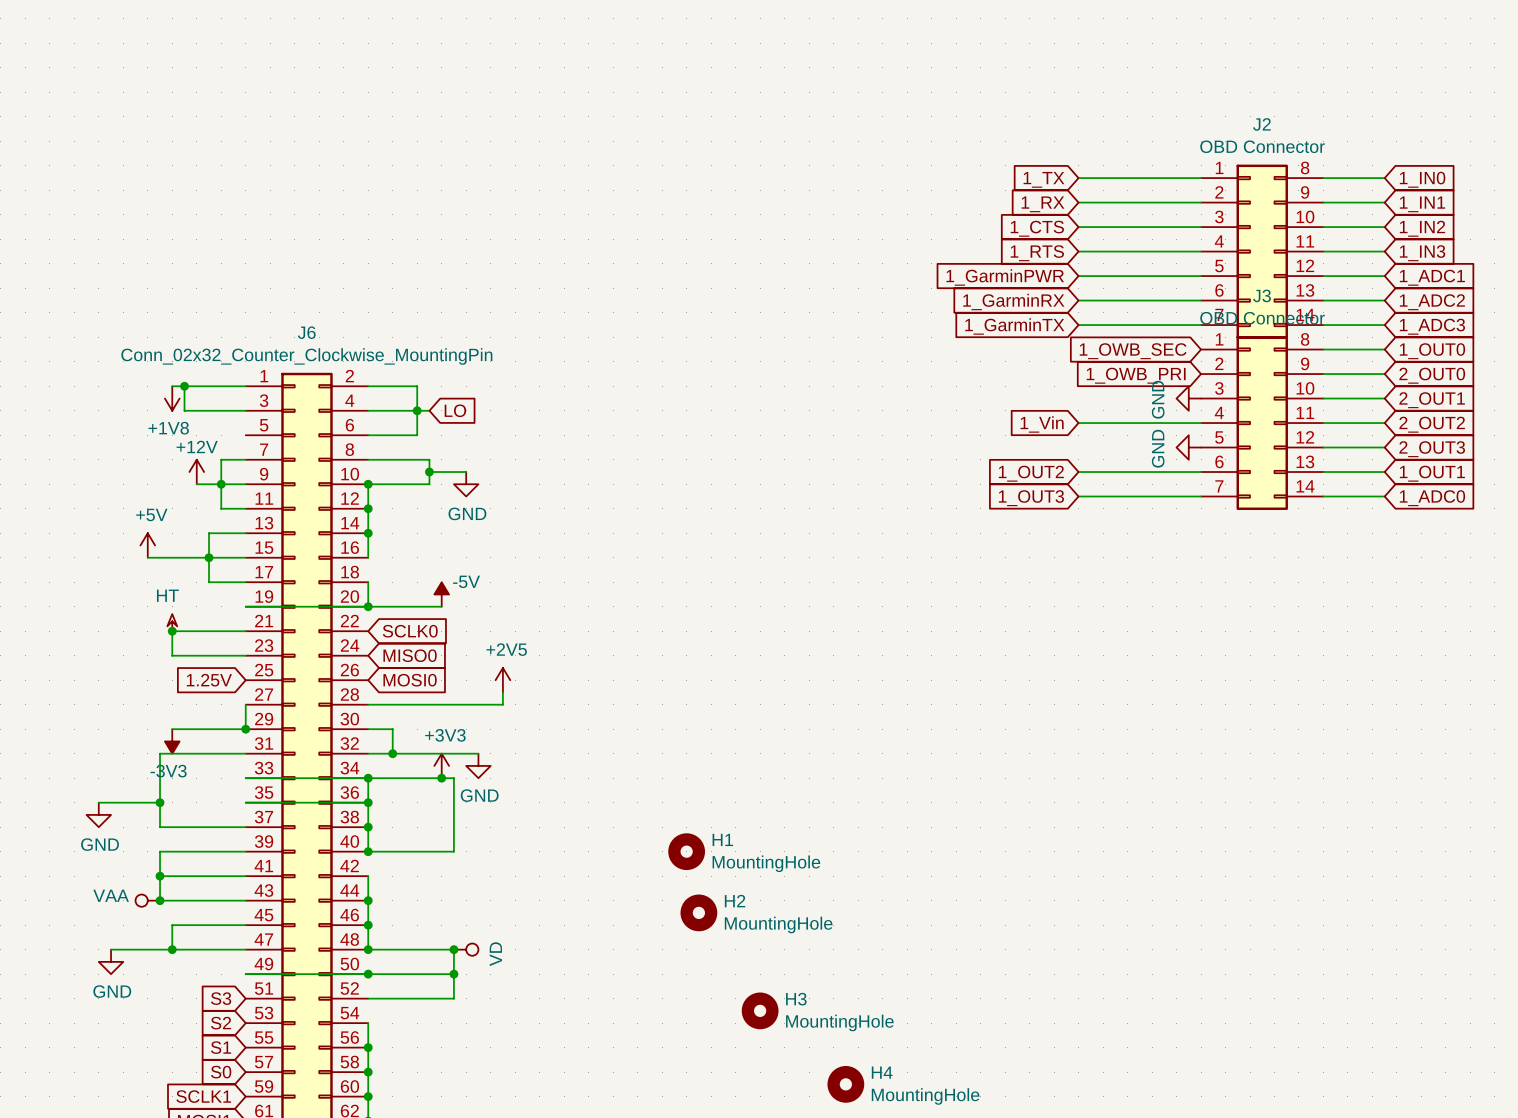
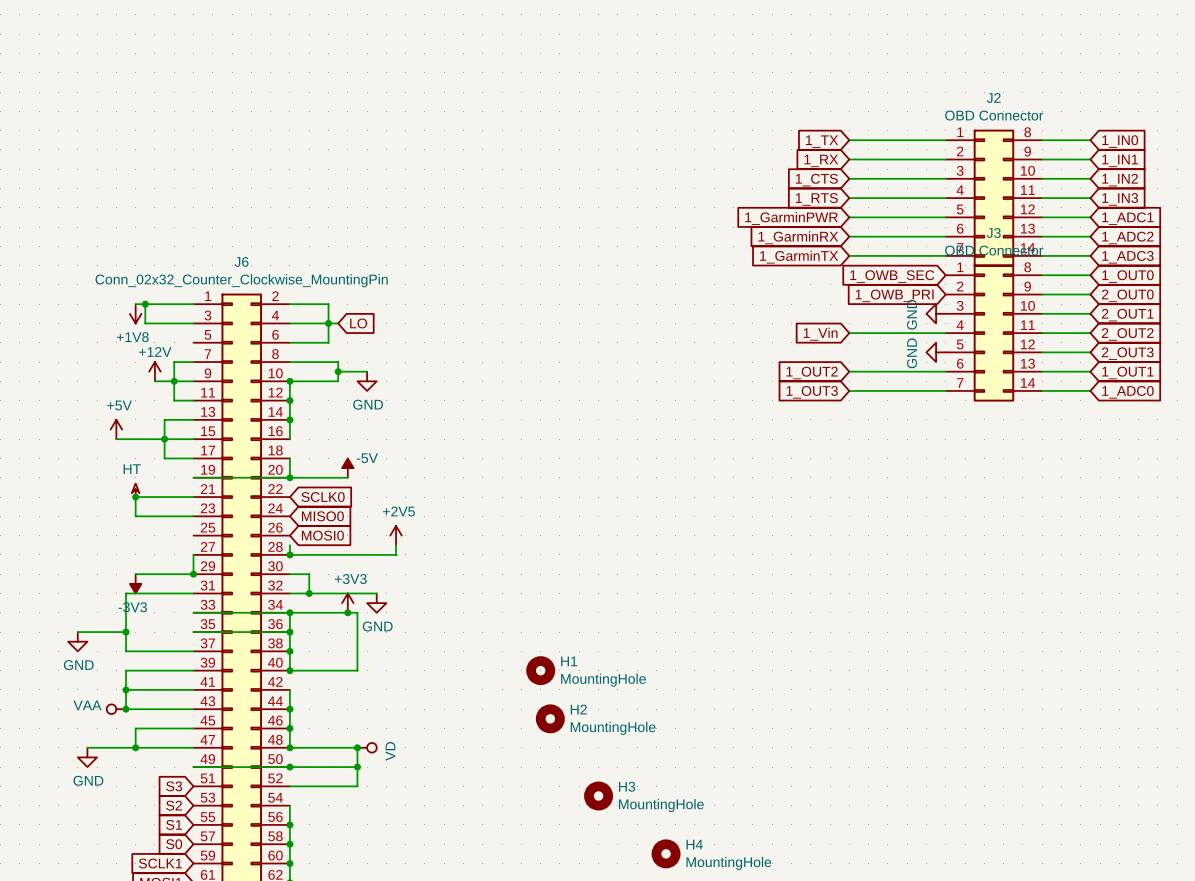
global label: 1.25V (209, 680) -> none
wire: none -> (289, 545) (289, 554)
junction: none -> (289, 554)

